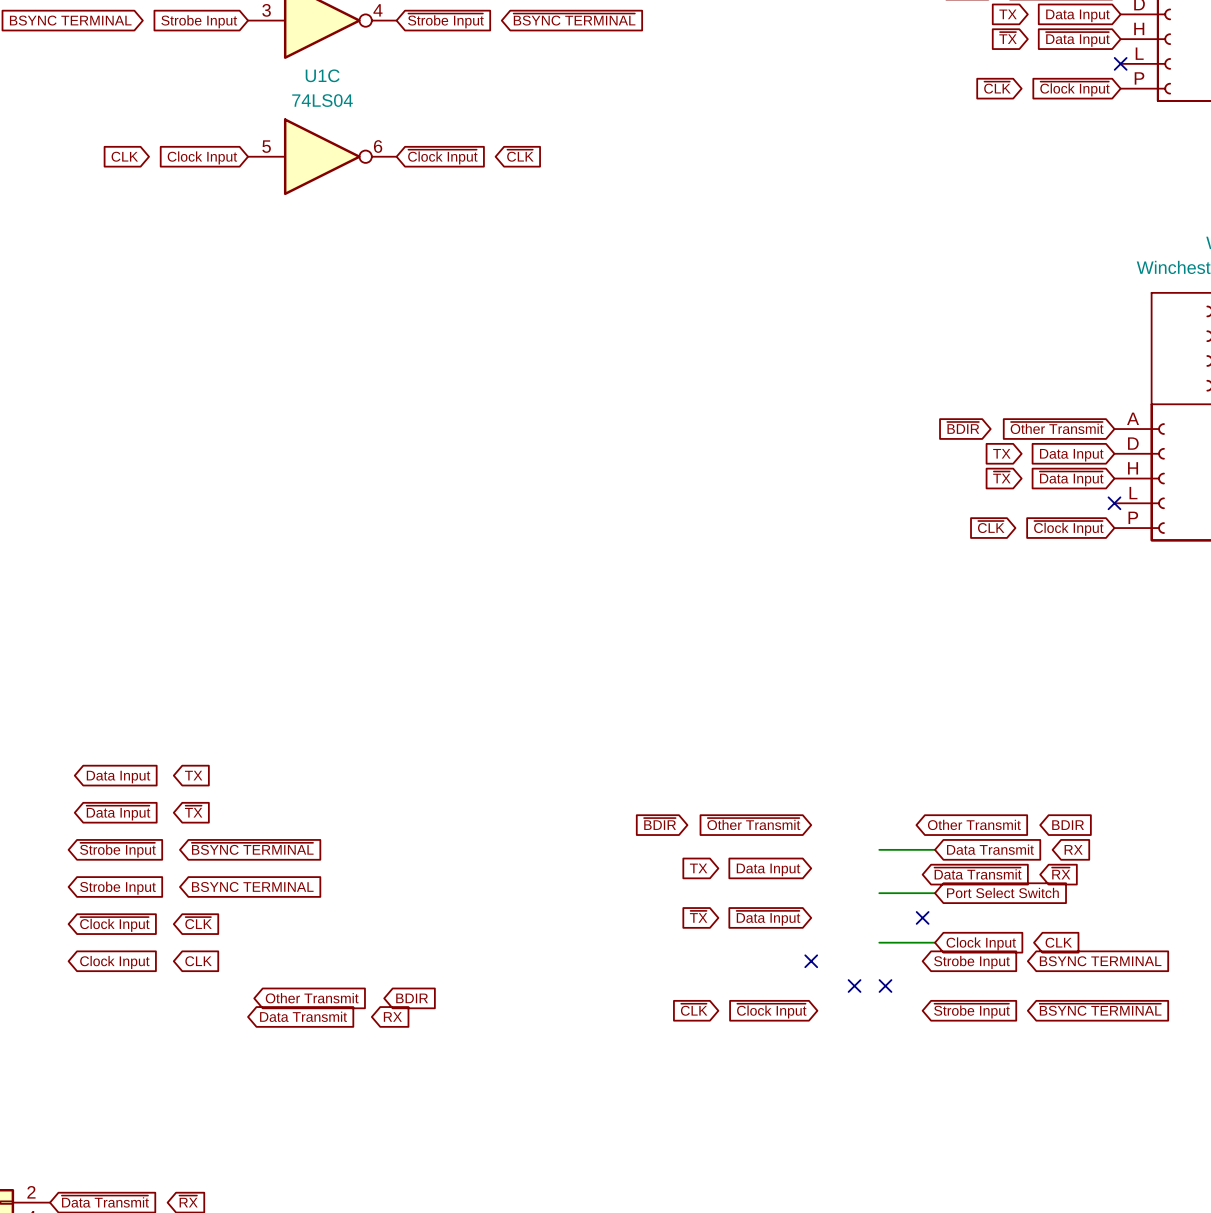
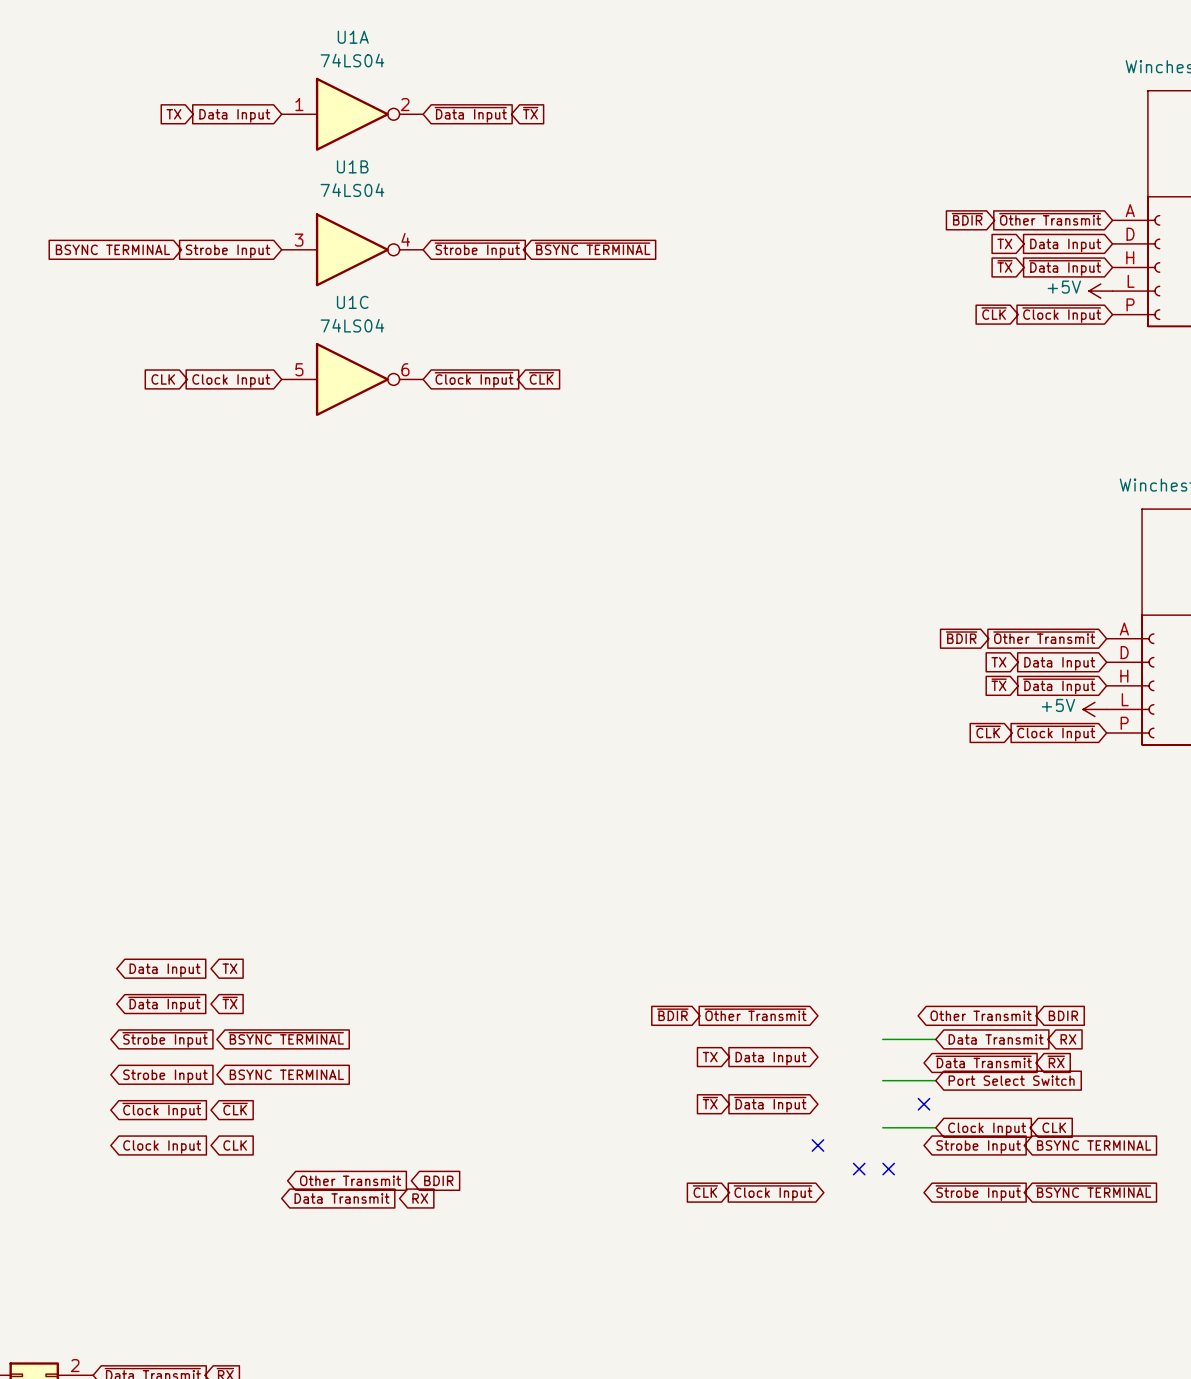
power symbol: none -> +5V (1100, 291)
no-connect mark: (1120, 63) -> none
power symbol: none -> +5V (1094, 709)
no-connect mark: (1114, 503) -> none

